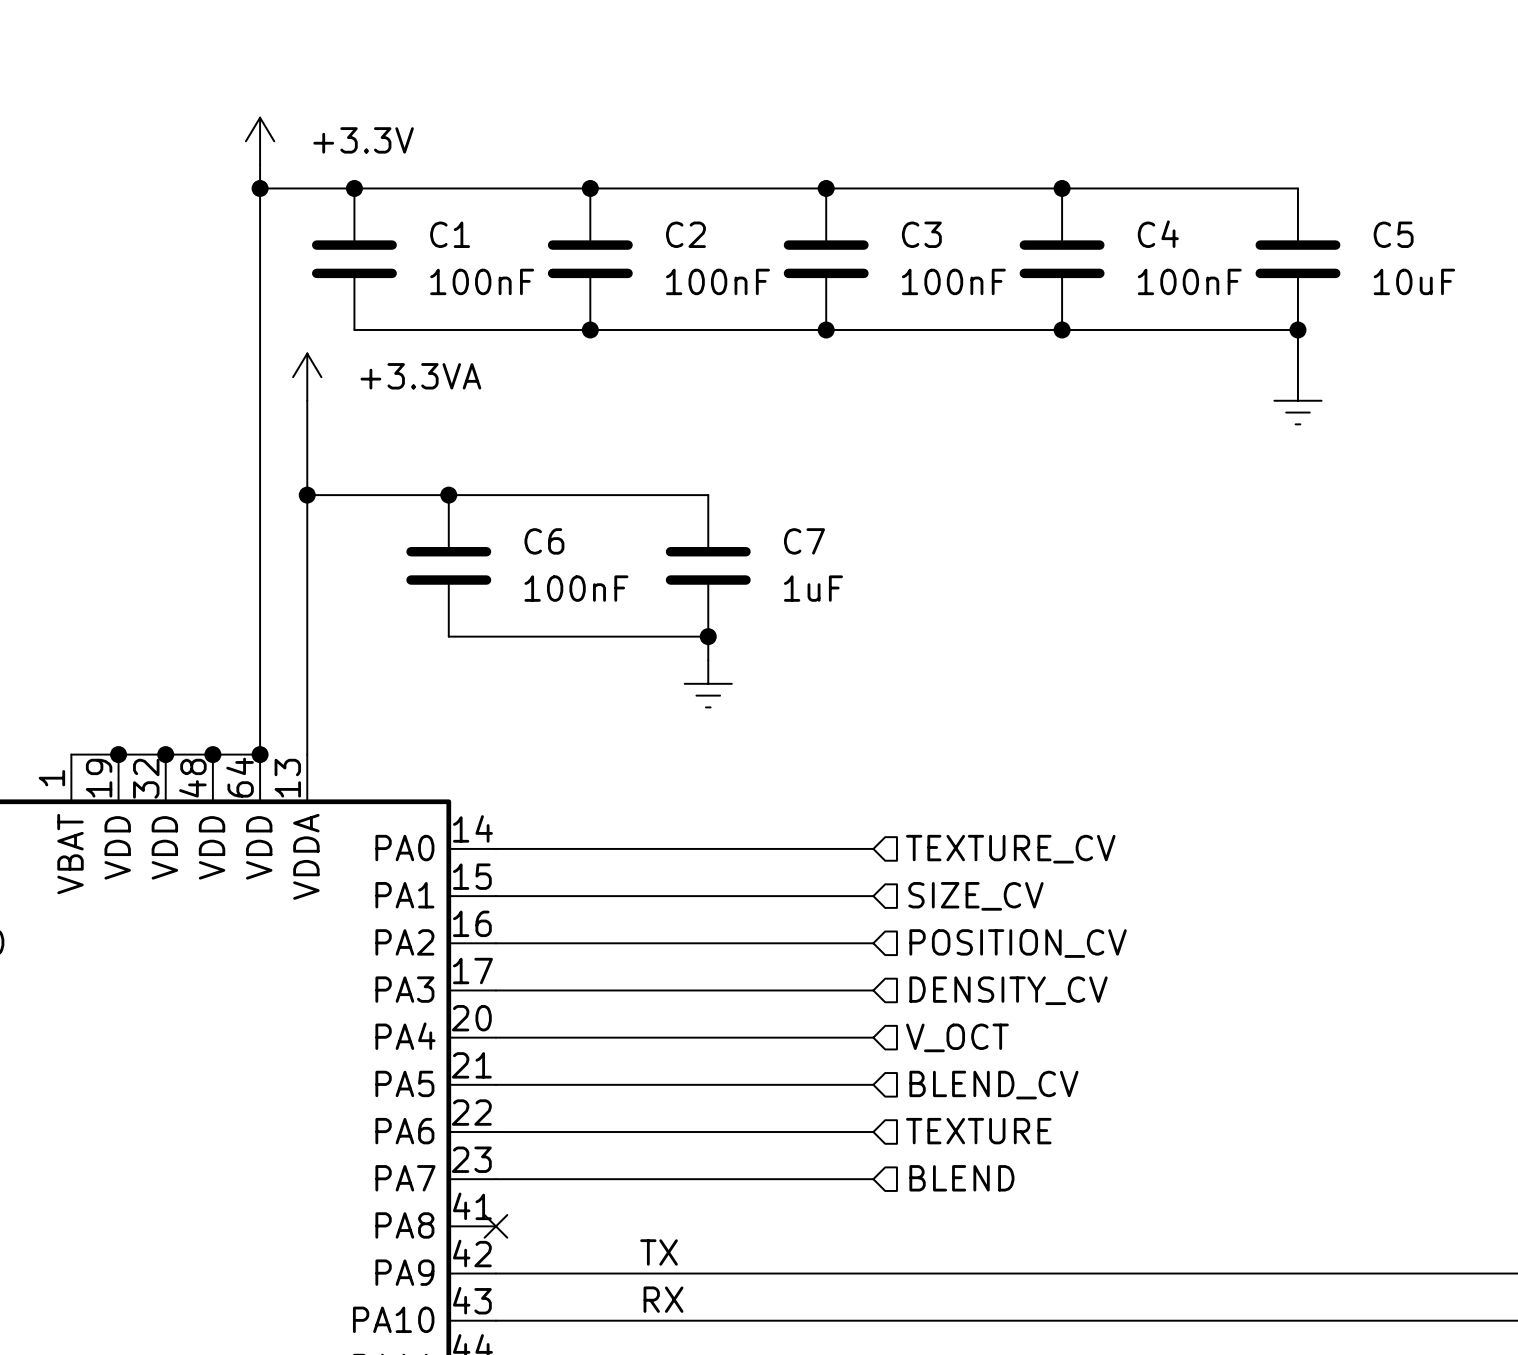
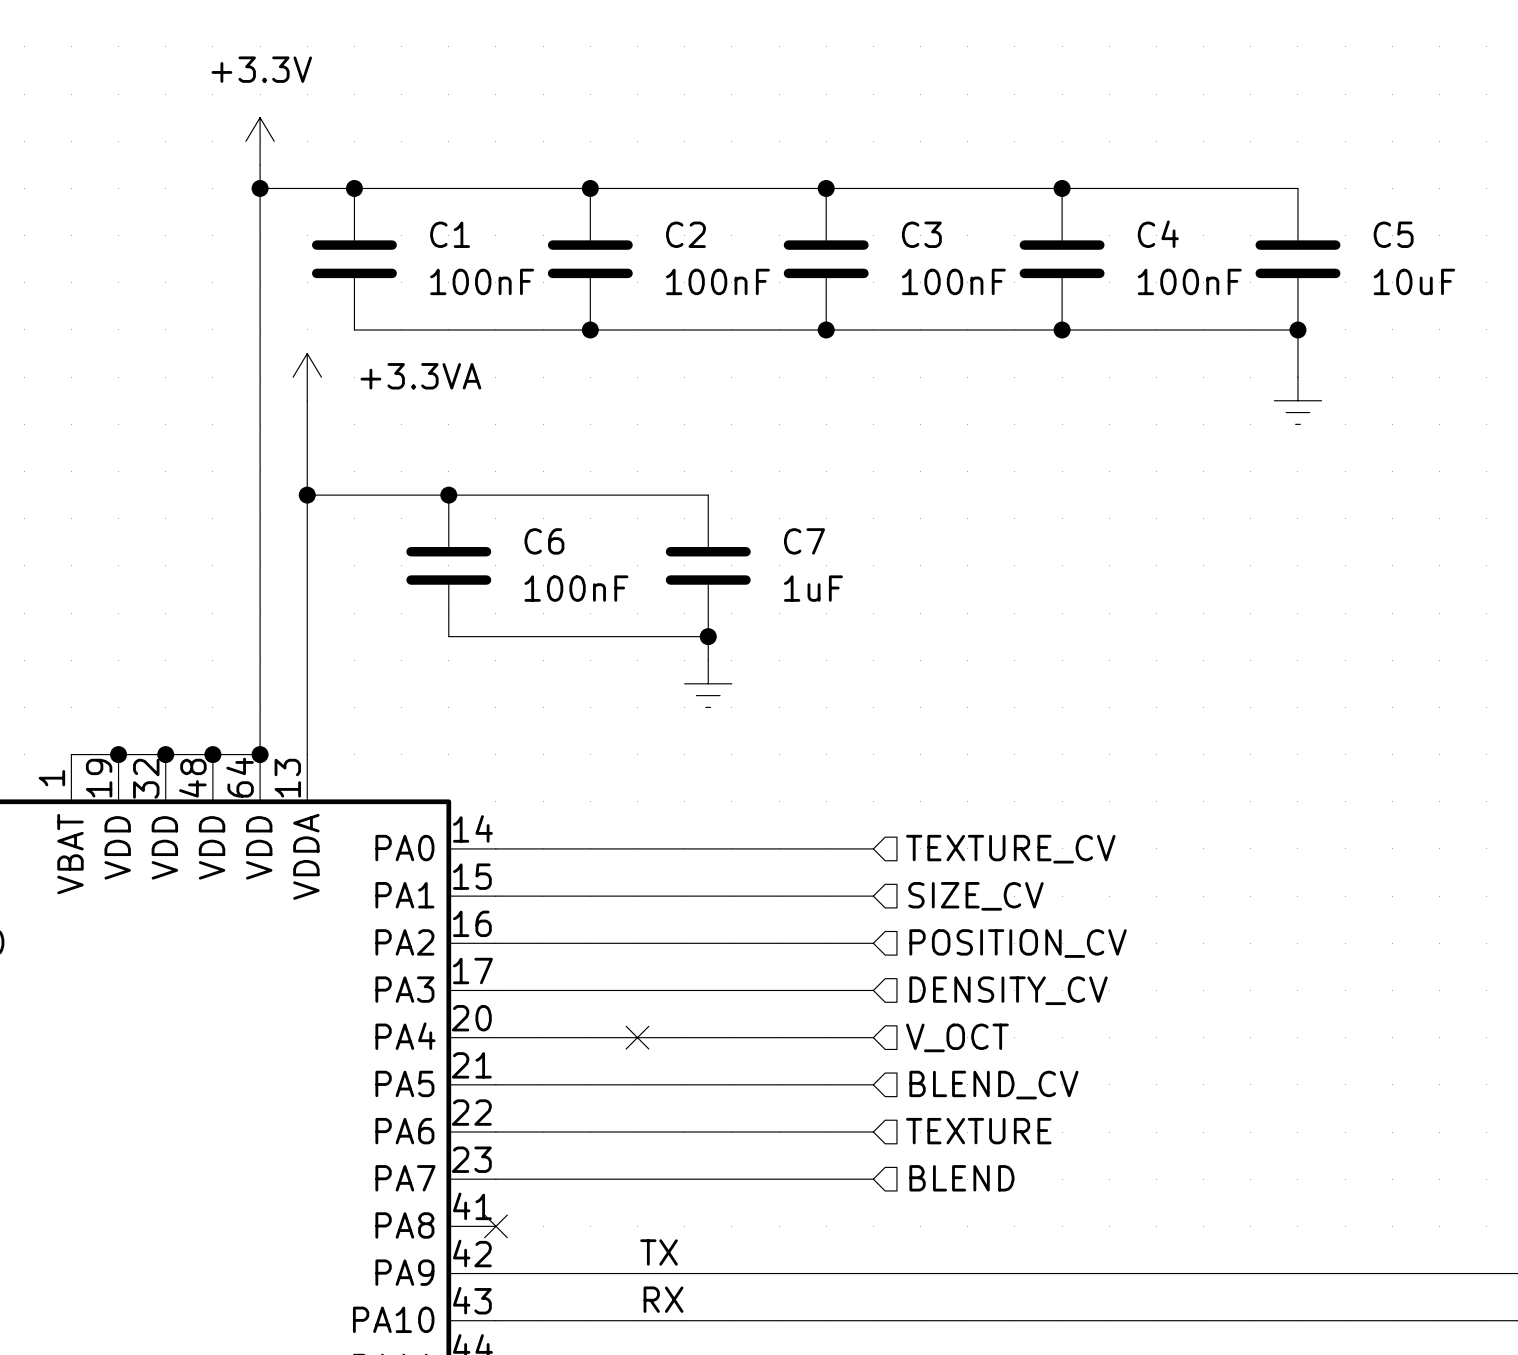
power symbol text position: +3.3V (363, 140) -> +3.3V (261, 69)
no-connect mark: none -> (637, 1037)

